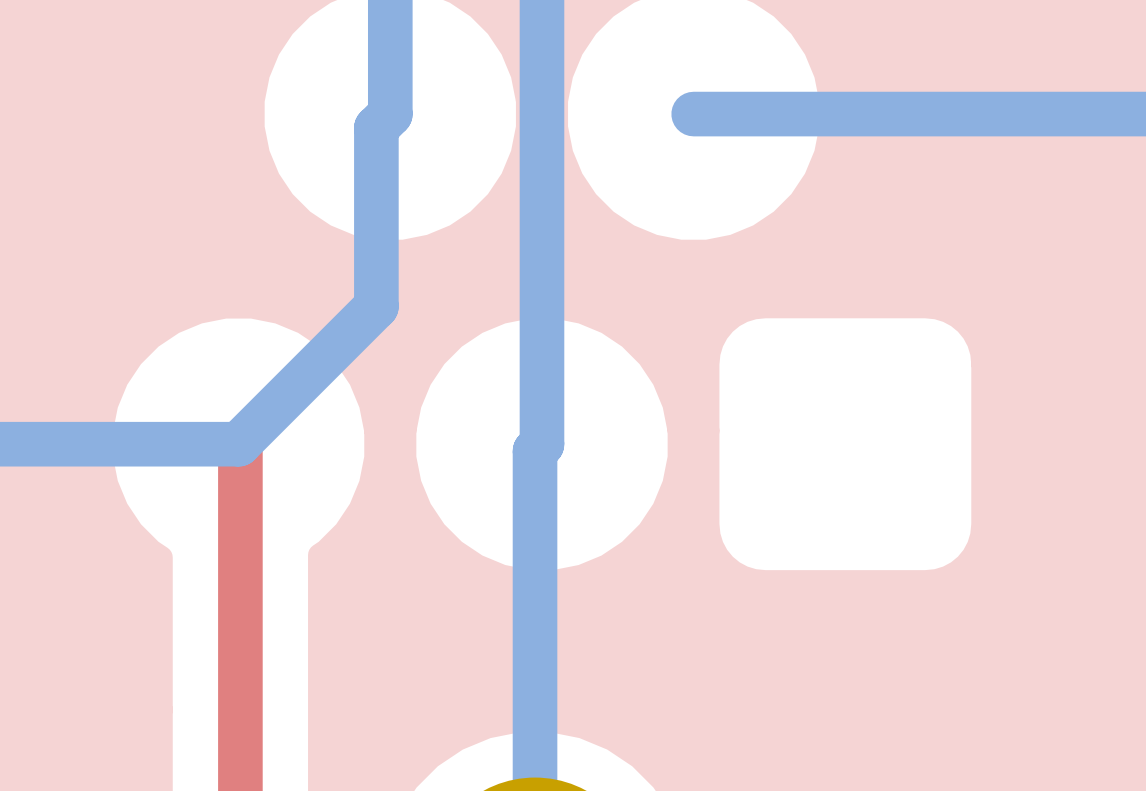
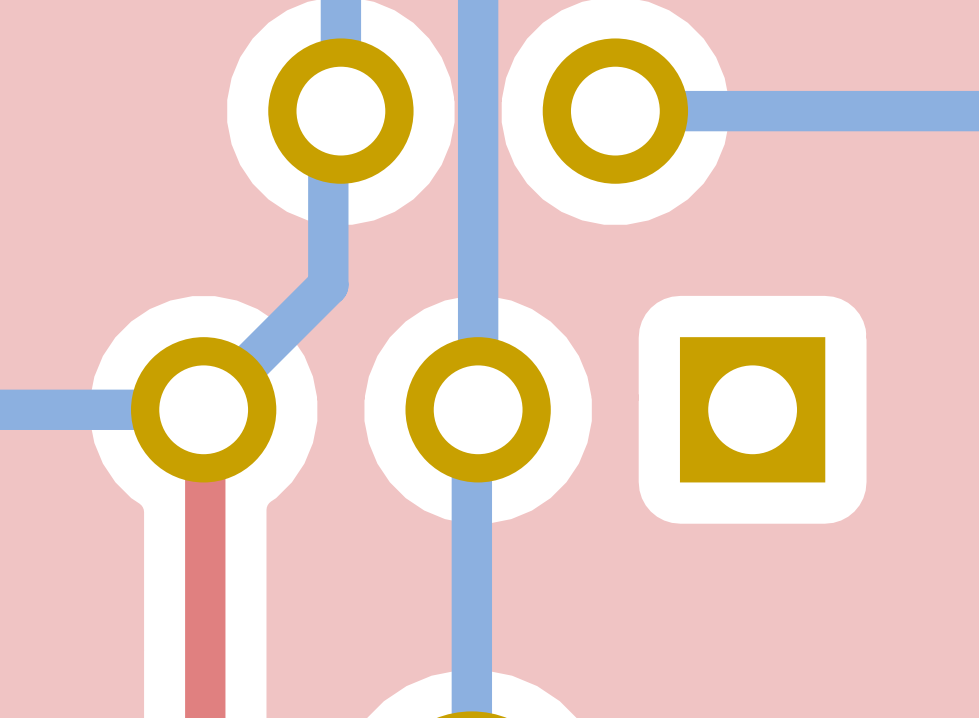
part: none -> (478, 260)

